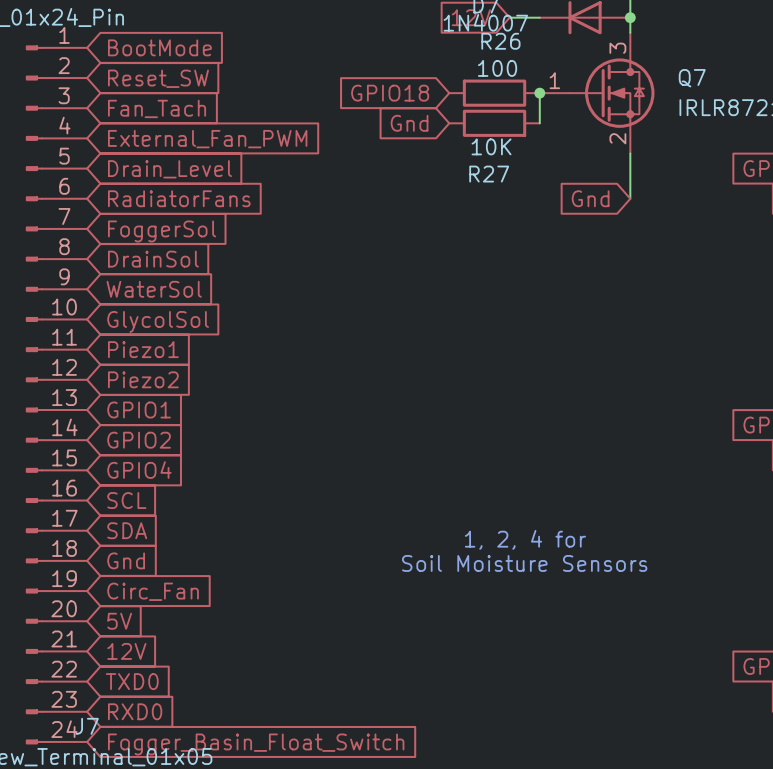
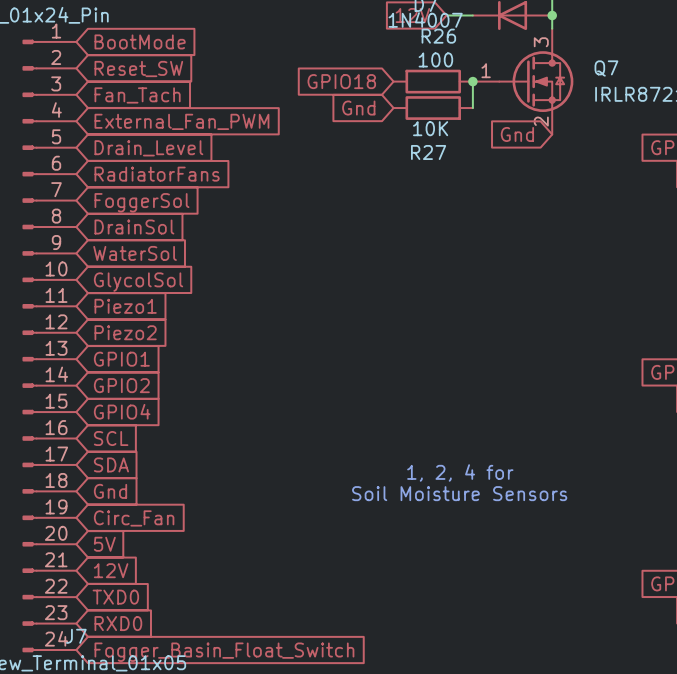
wire: (630, 153) (630, 198) -> none
global label position: Gnd (590, 198) -> Gnd (517, 134)

